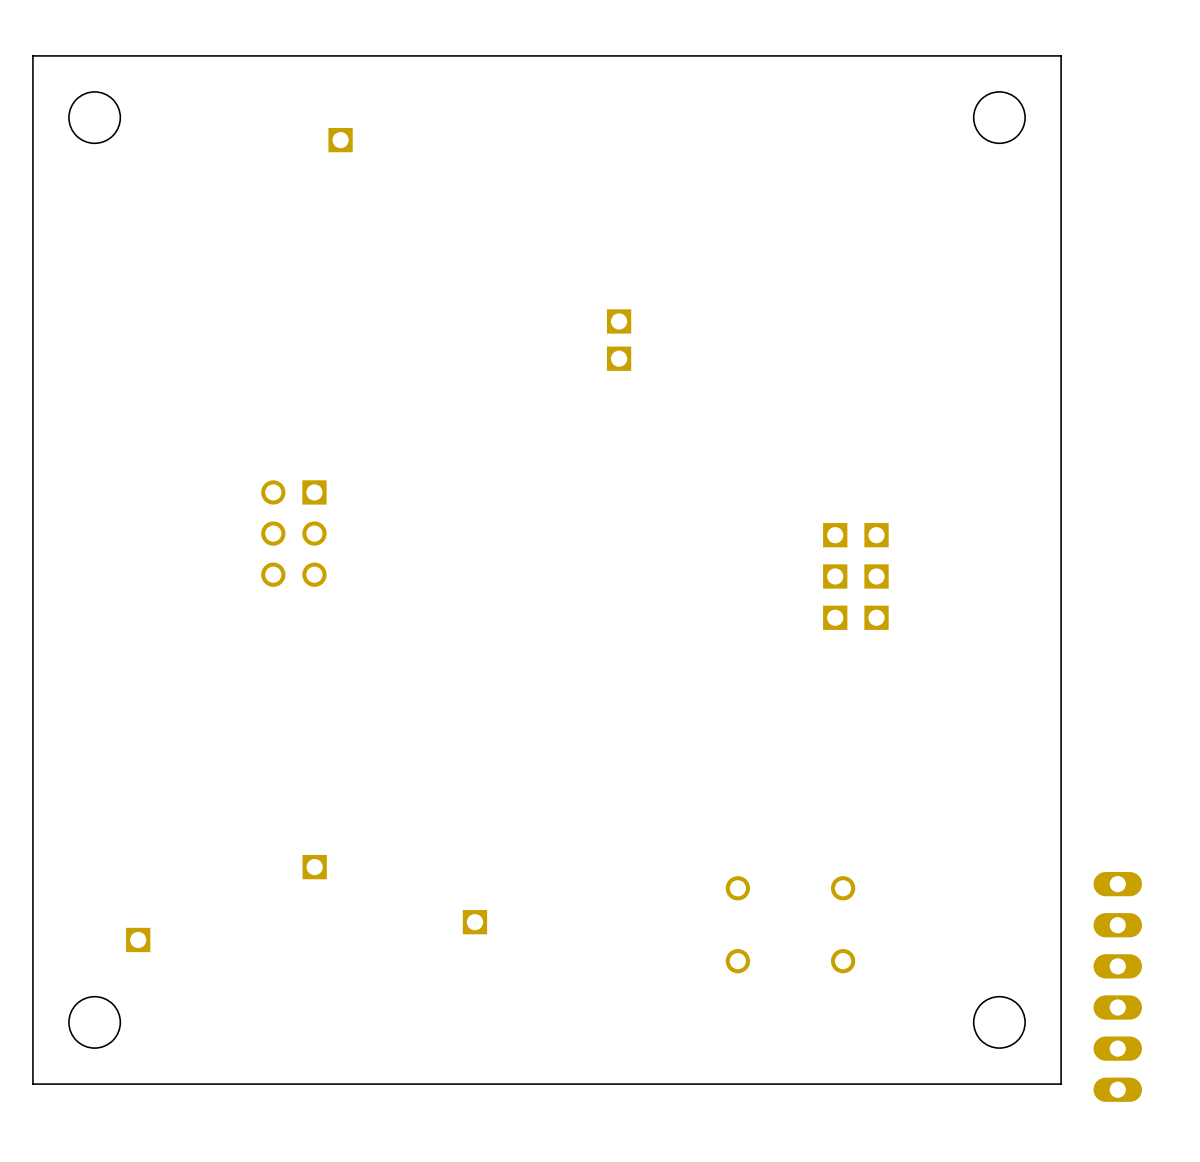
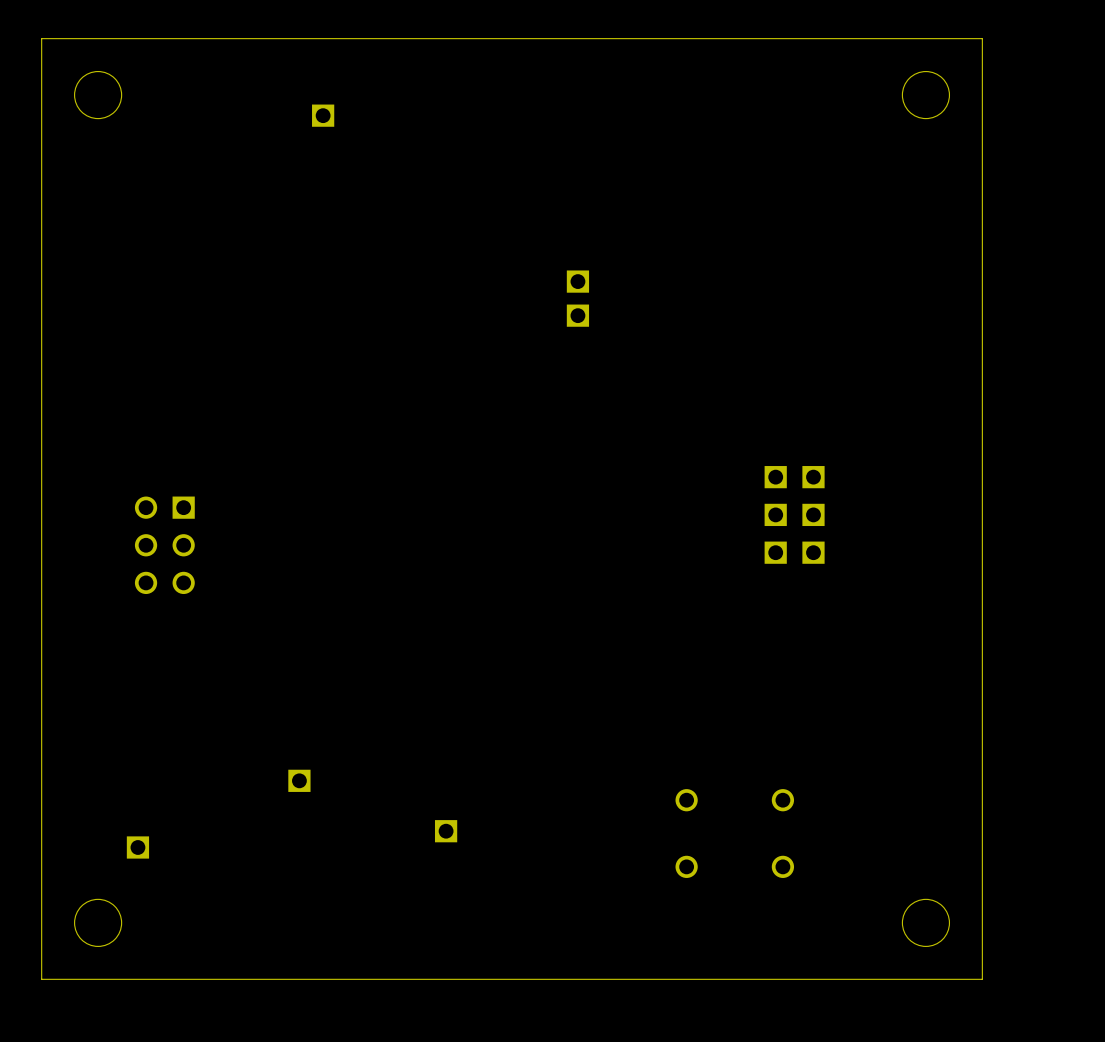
part position: (293, 533) -> (164, 545)
part: (1117, 986) -> none

